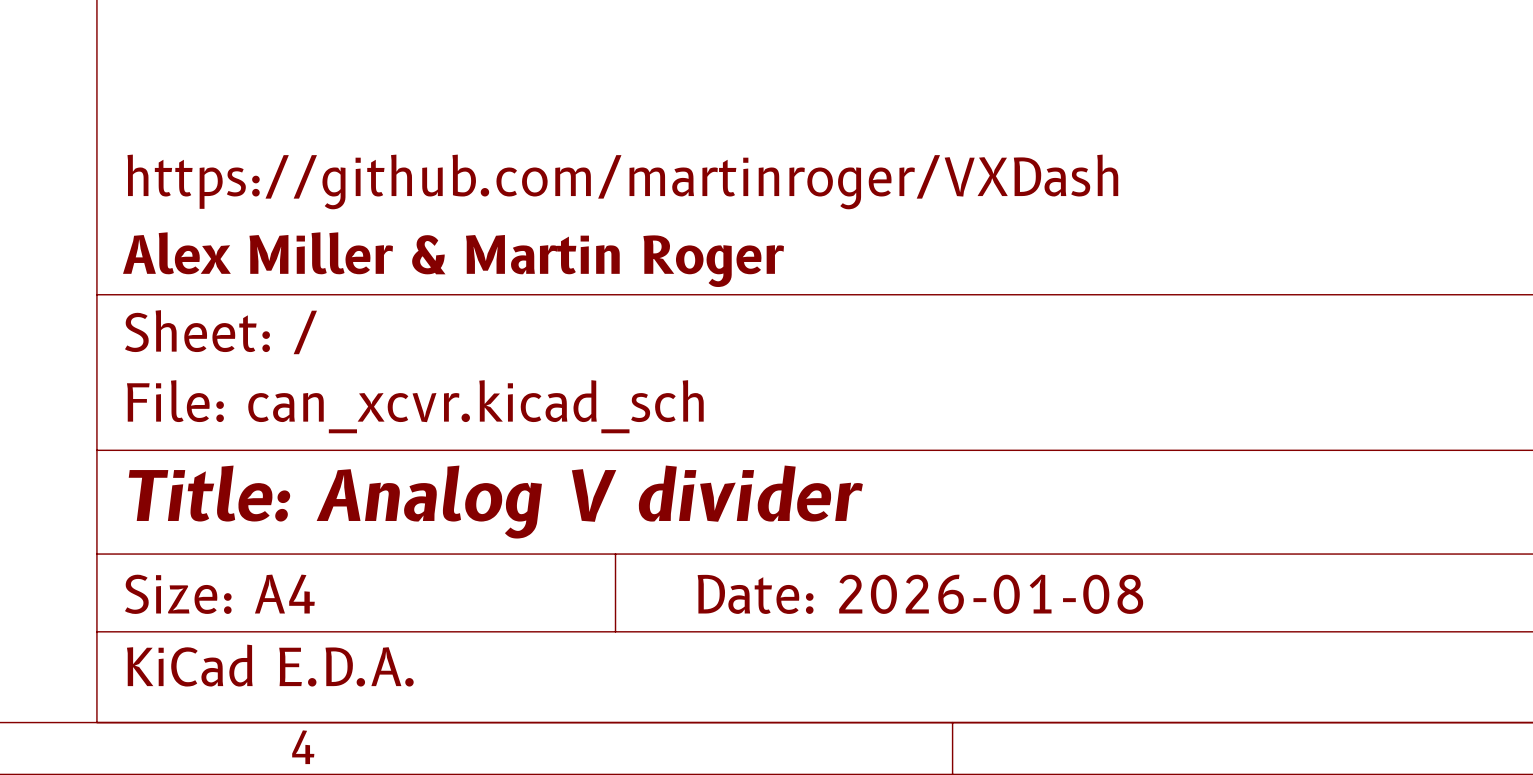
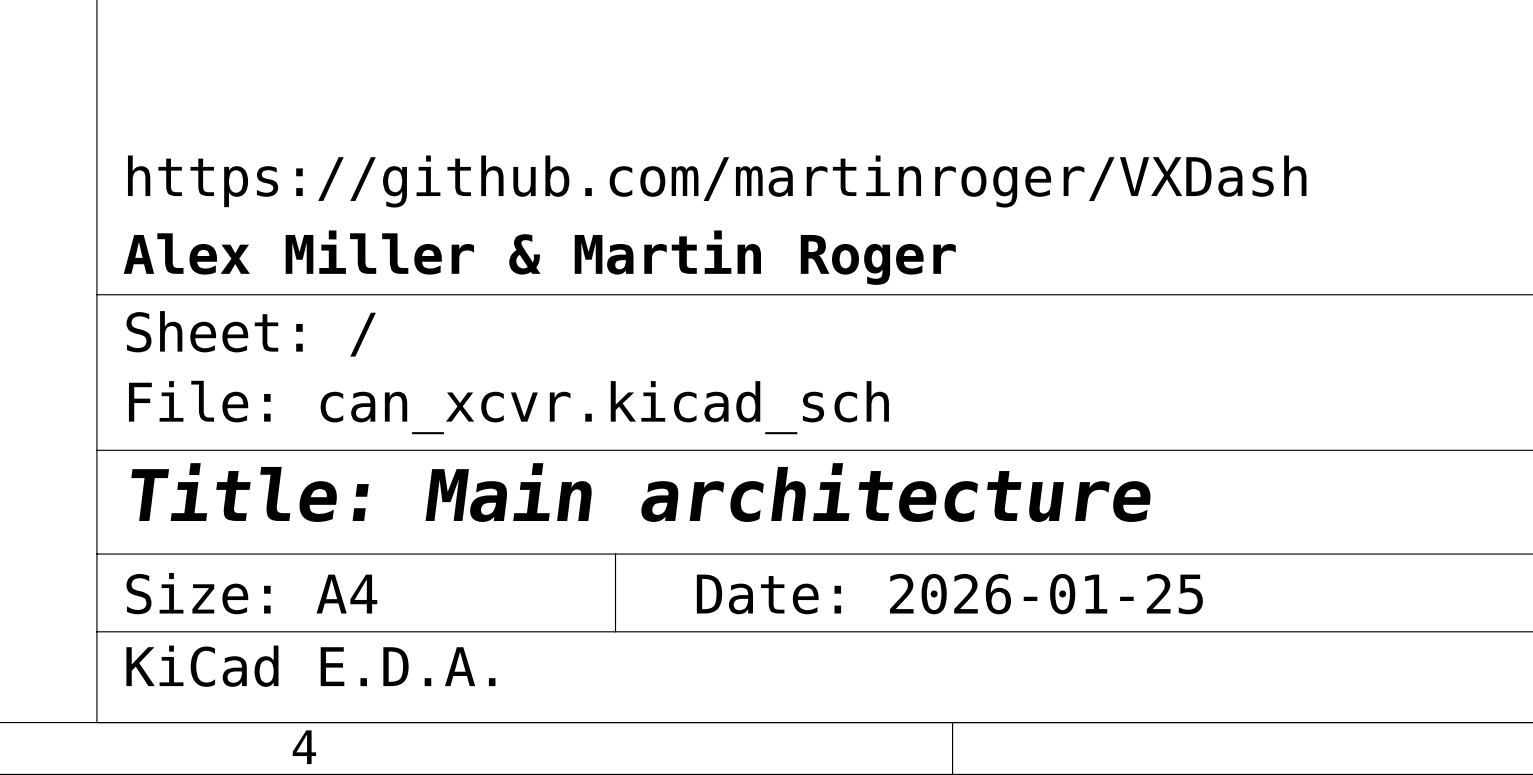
title block: Title: Analog V divider (495, 502) -> Title: Main architecture (641, 492)
title block: Date: 2026-01-08 (920, 594) -> Date: 2026-01-25 (949, 594)

